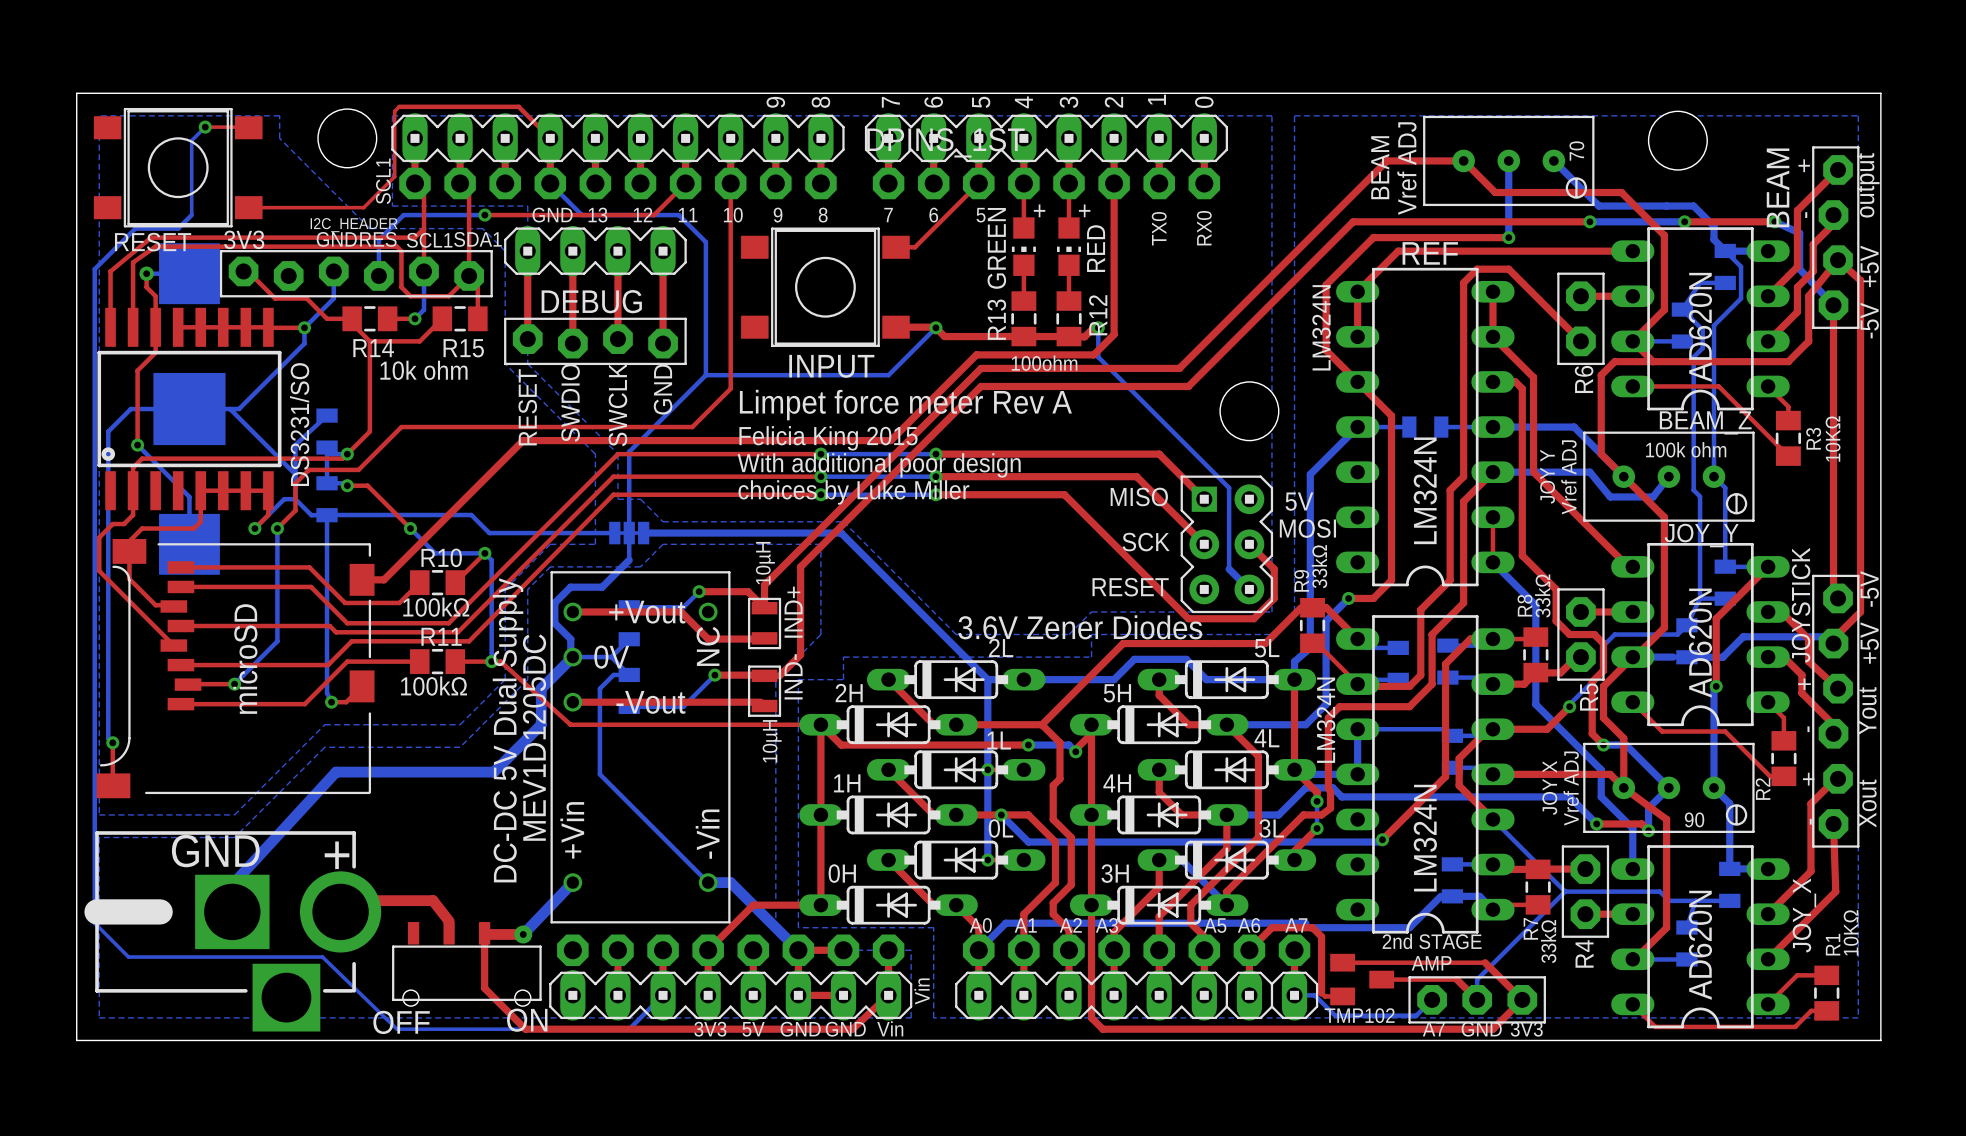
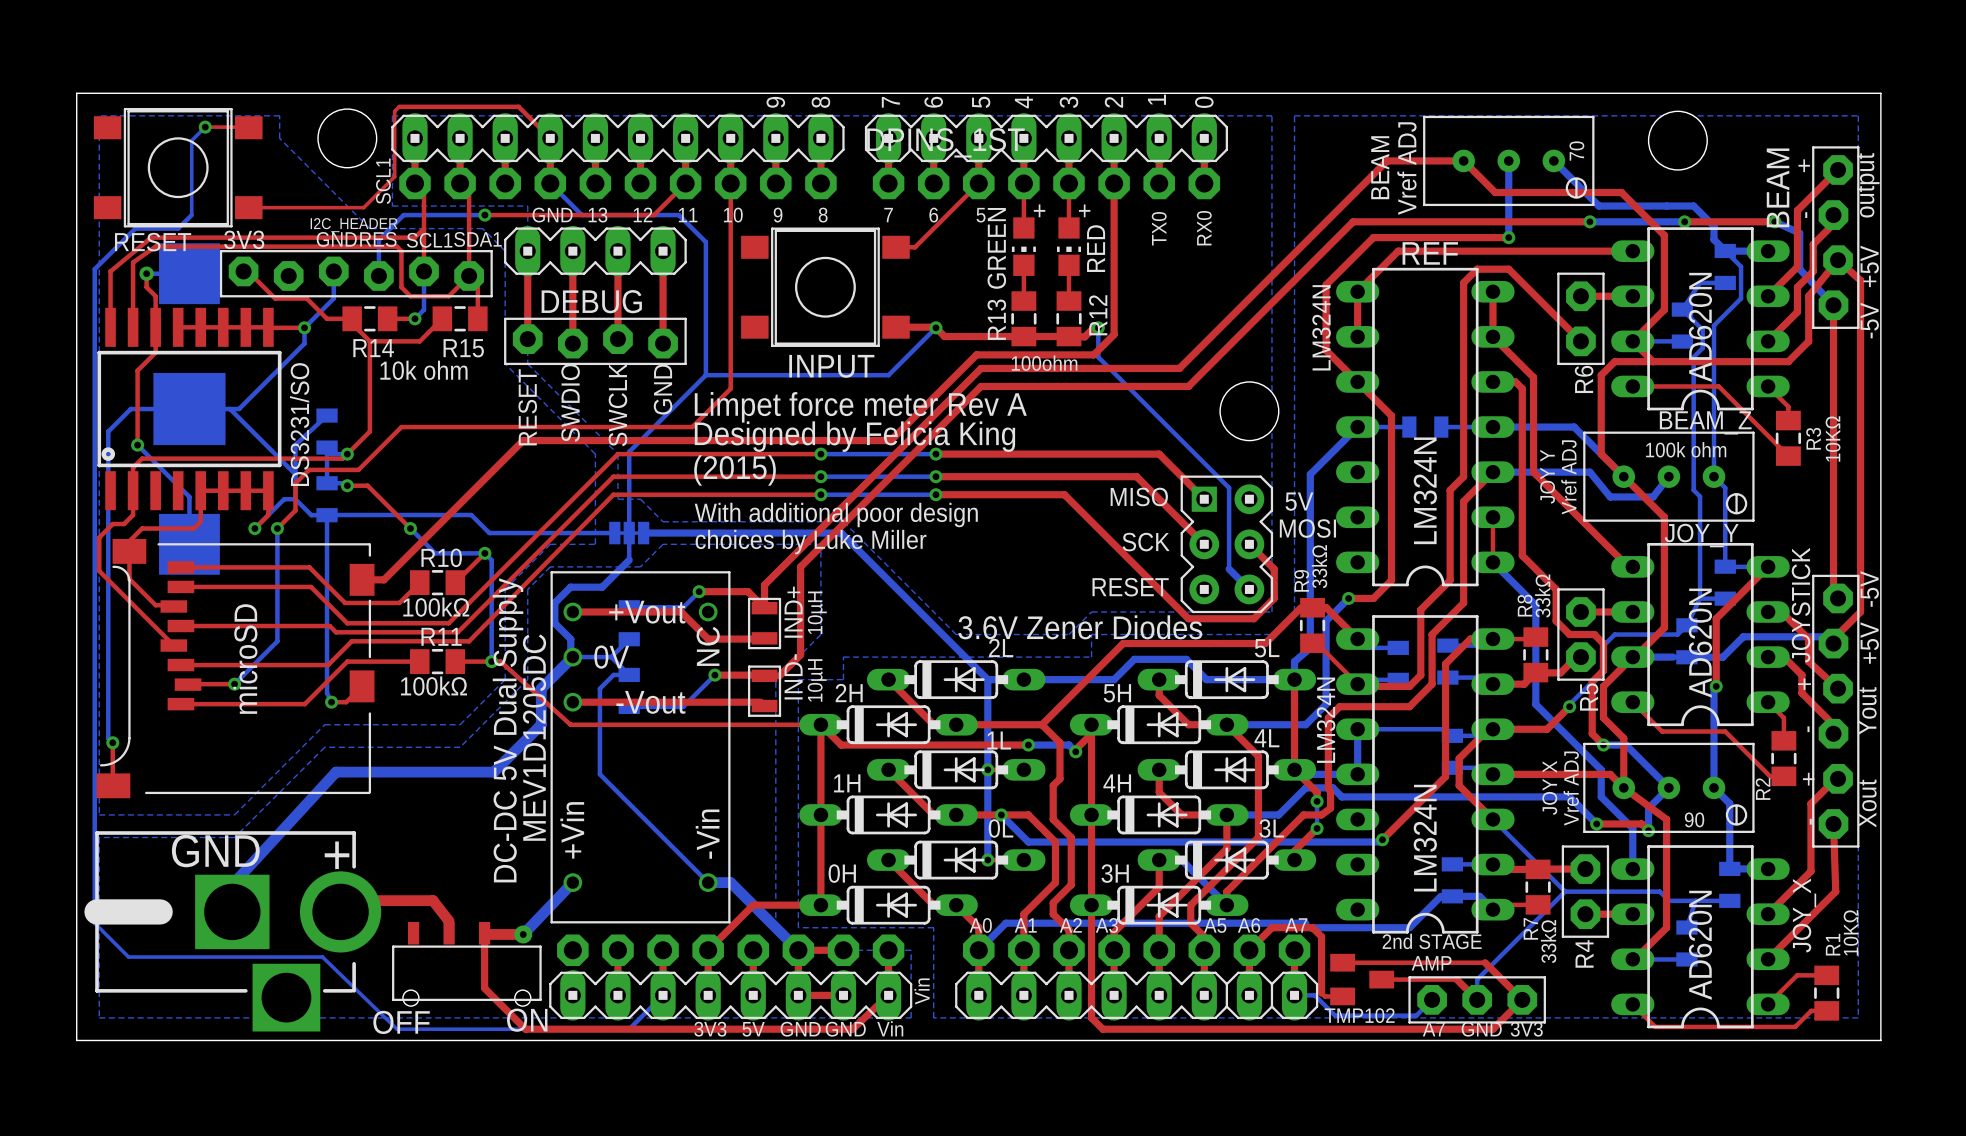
text position: Limpet force meter Rev A (905, 405) -> Limpet force meter Rev A (860, 407)
text: none -> Designed by Felicia King (854, 436)
text: Felicia King 2015 (828, 438) -> none
text position: With additional poor design (879, 465) -> With additional poor design (836, 514)
text: none -> (2015) (735, 470)
text position: choices by Luke Miller (853, 492) -> choices by Luke Miller (811, 542)
IND+ value position: 10µH (765, 563) -> 10µH (817, 612)
IND- value position: 10µH (772, 741) -> 10µH (817, 680)

